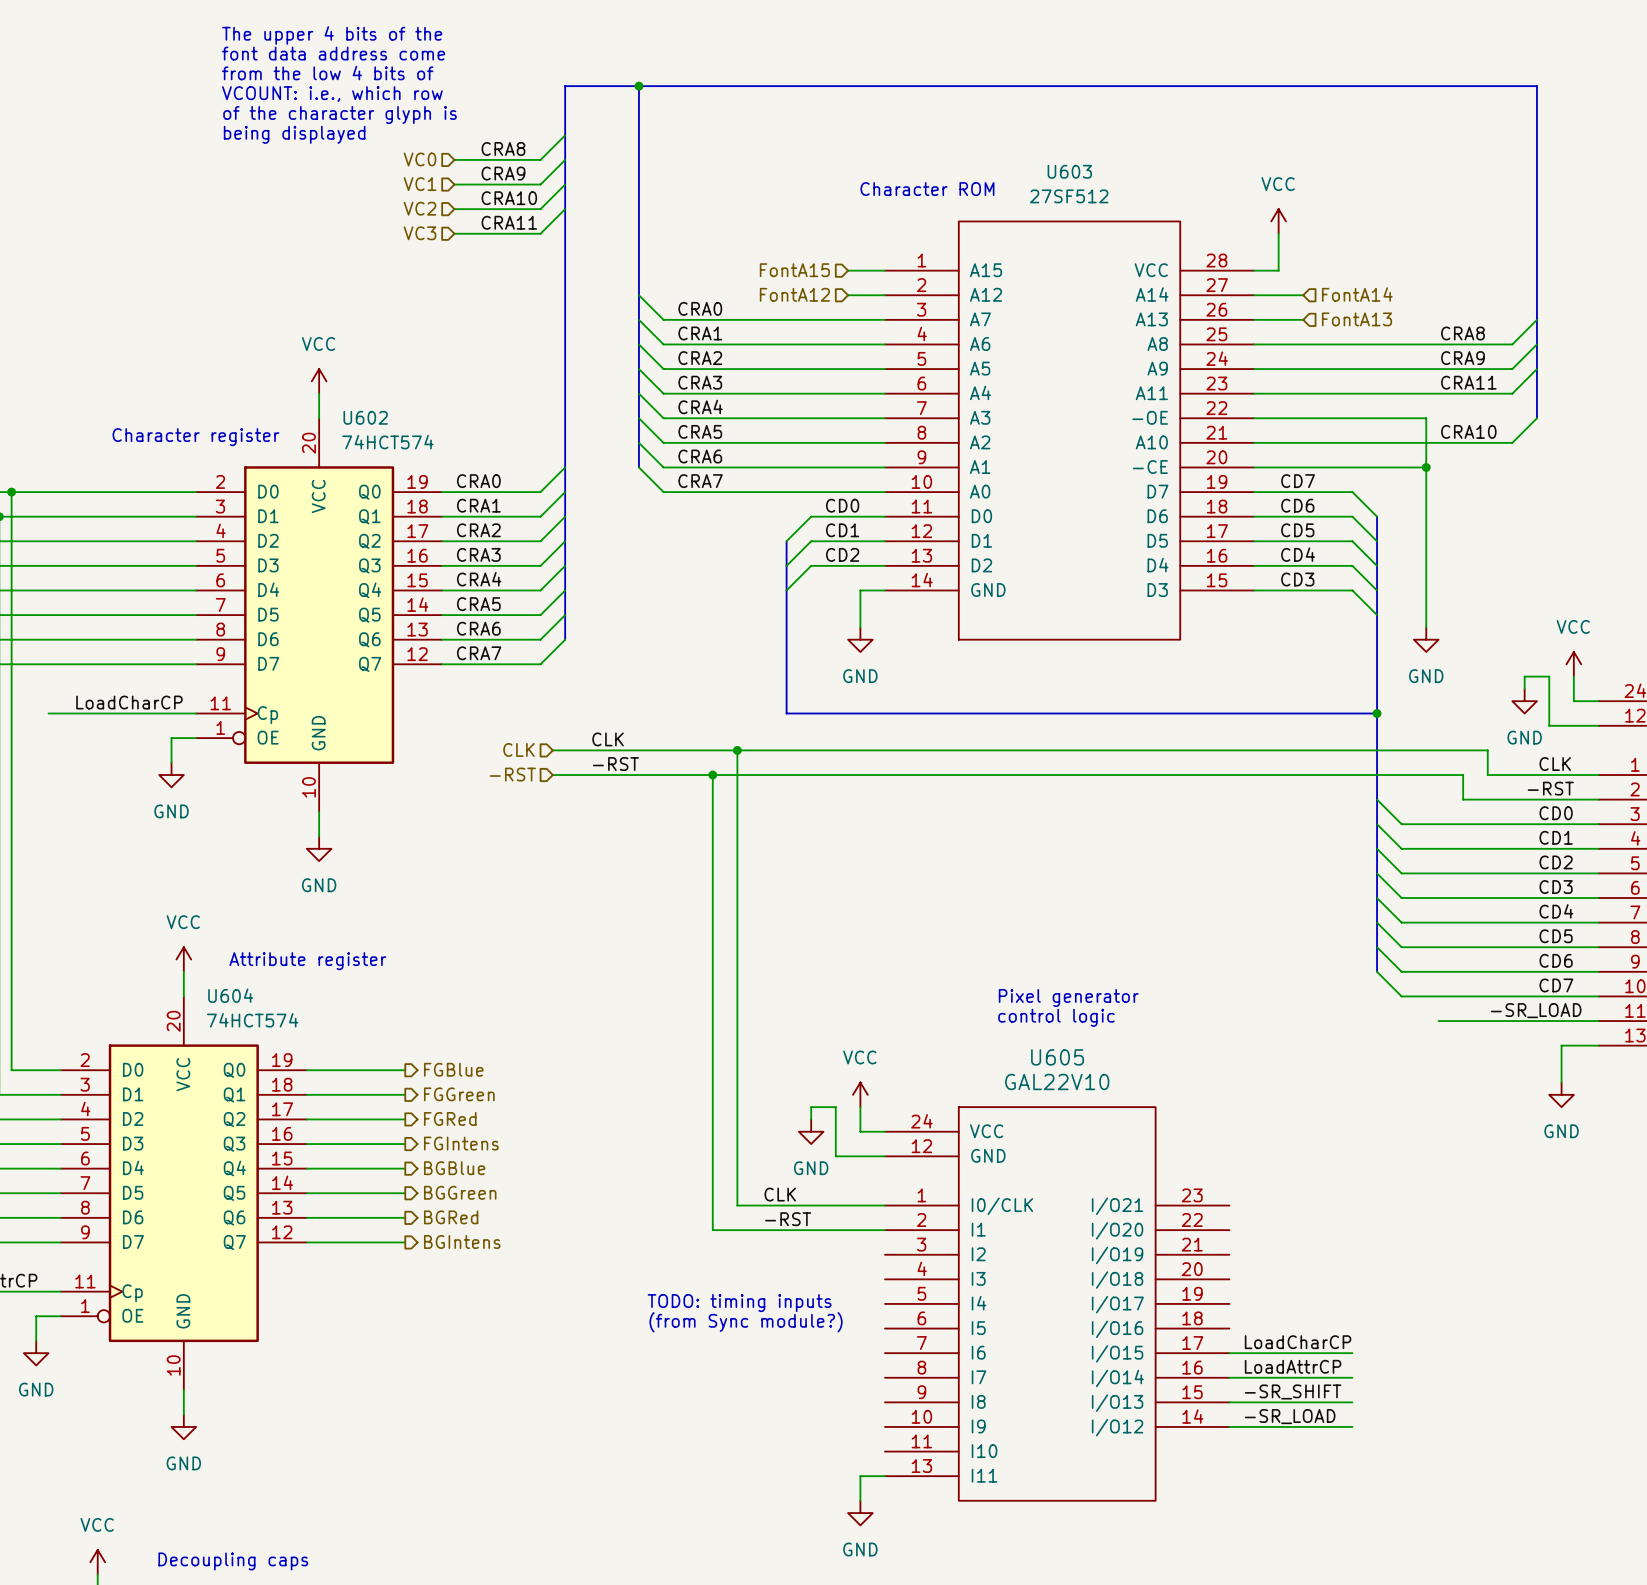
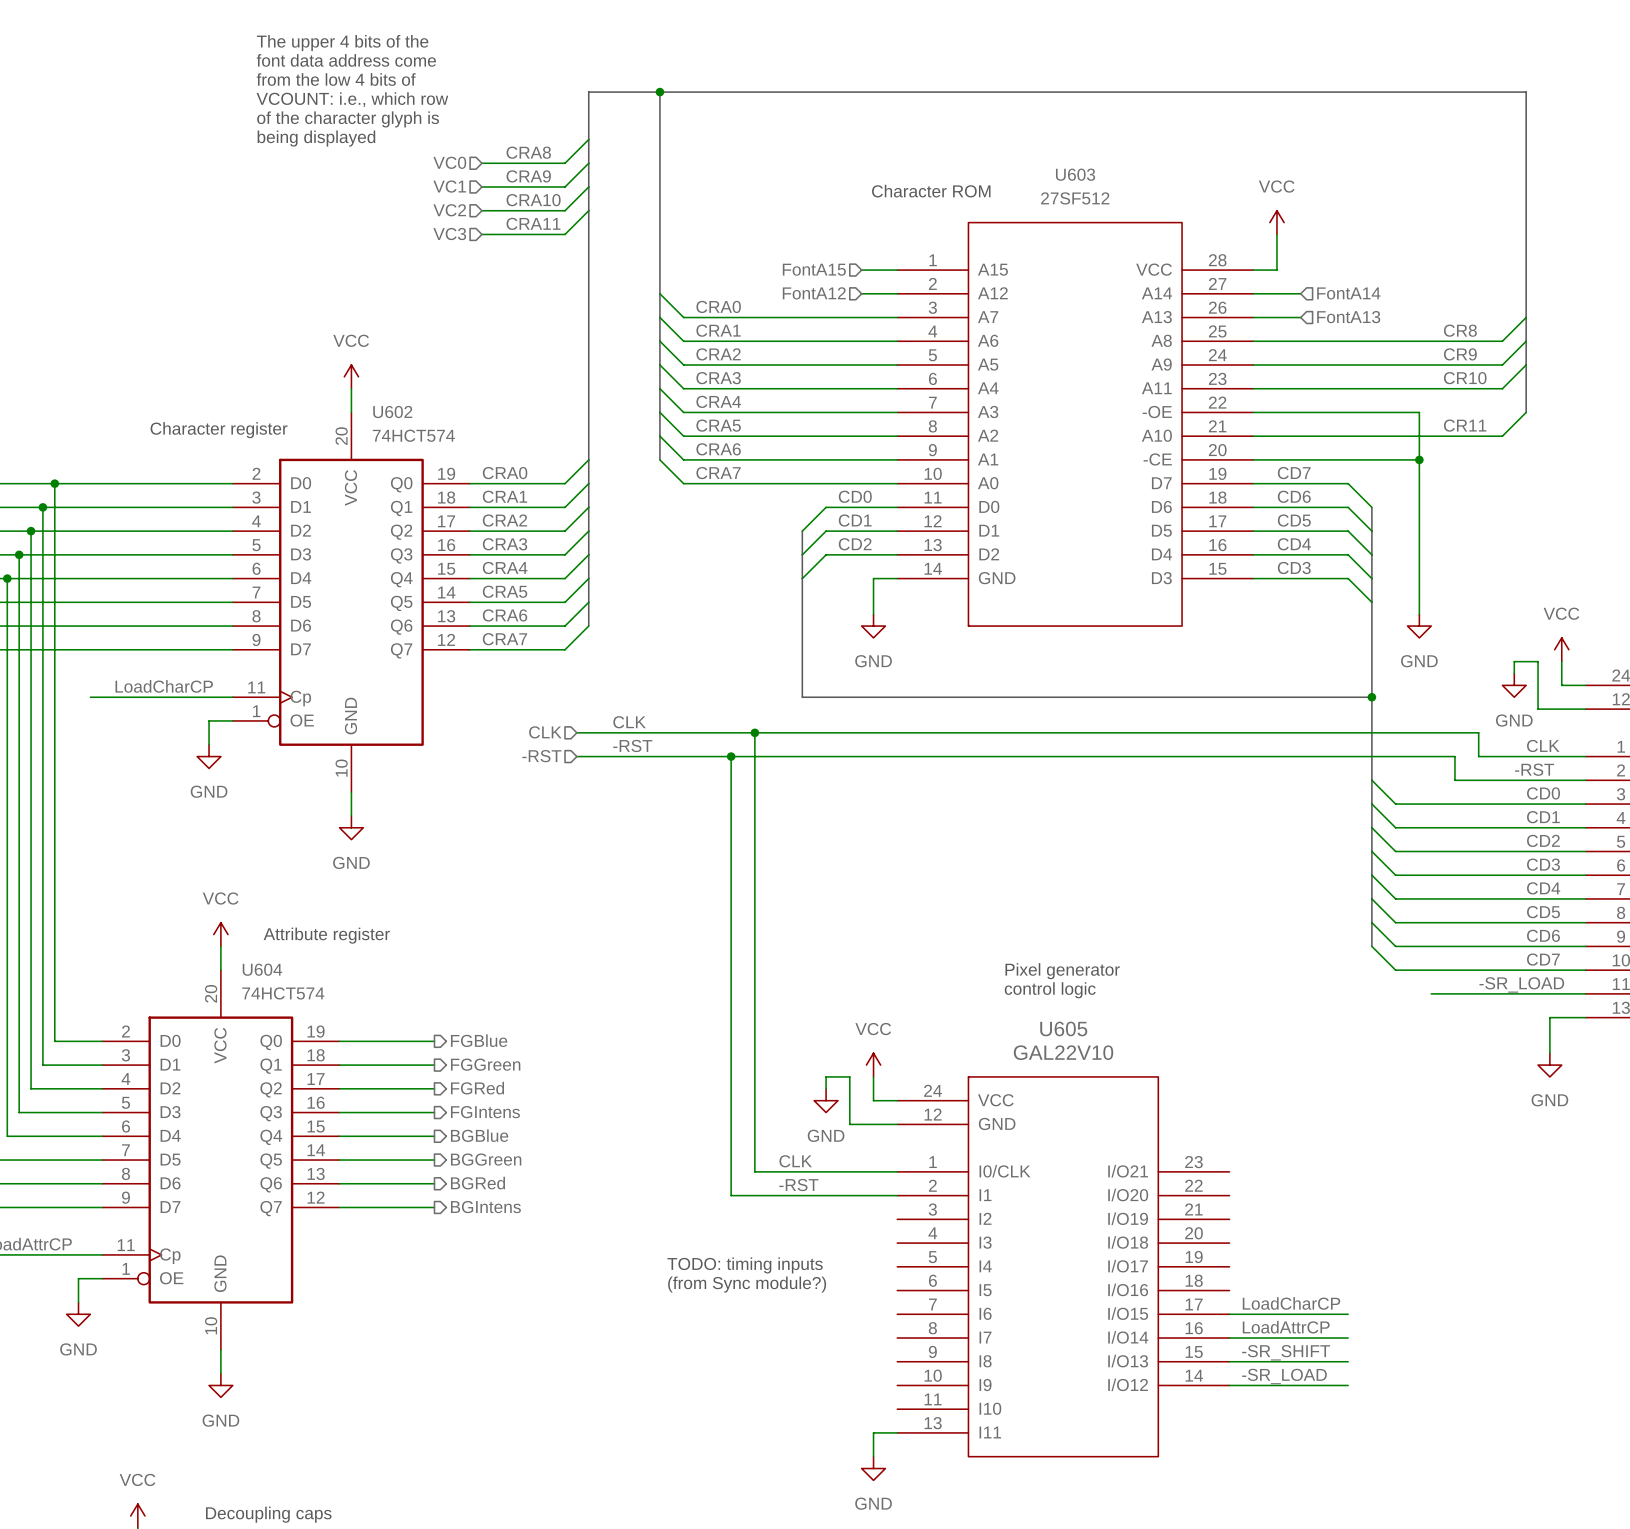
label: CRA8 (1462, 333) -> CR8 (1460, 330)
label: CRA9 (1462, 358) -> CR9 (1460, 354)
label: CRA11 (1468, 382) -> CR10 (1465, 378)
label: CRA10 (1468, 431) -> CR11 (1465, 425)

